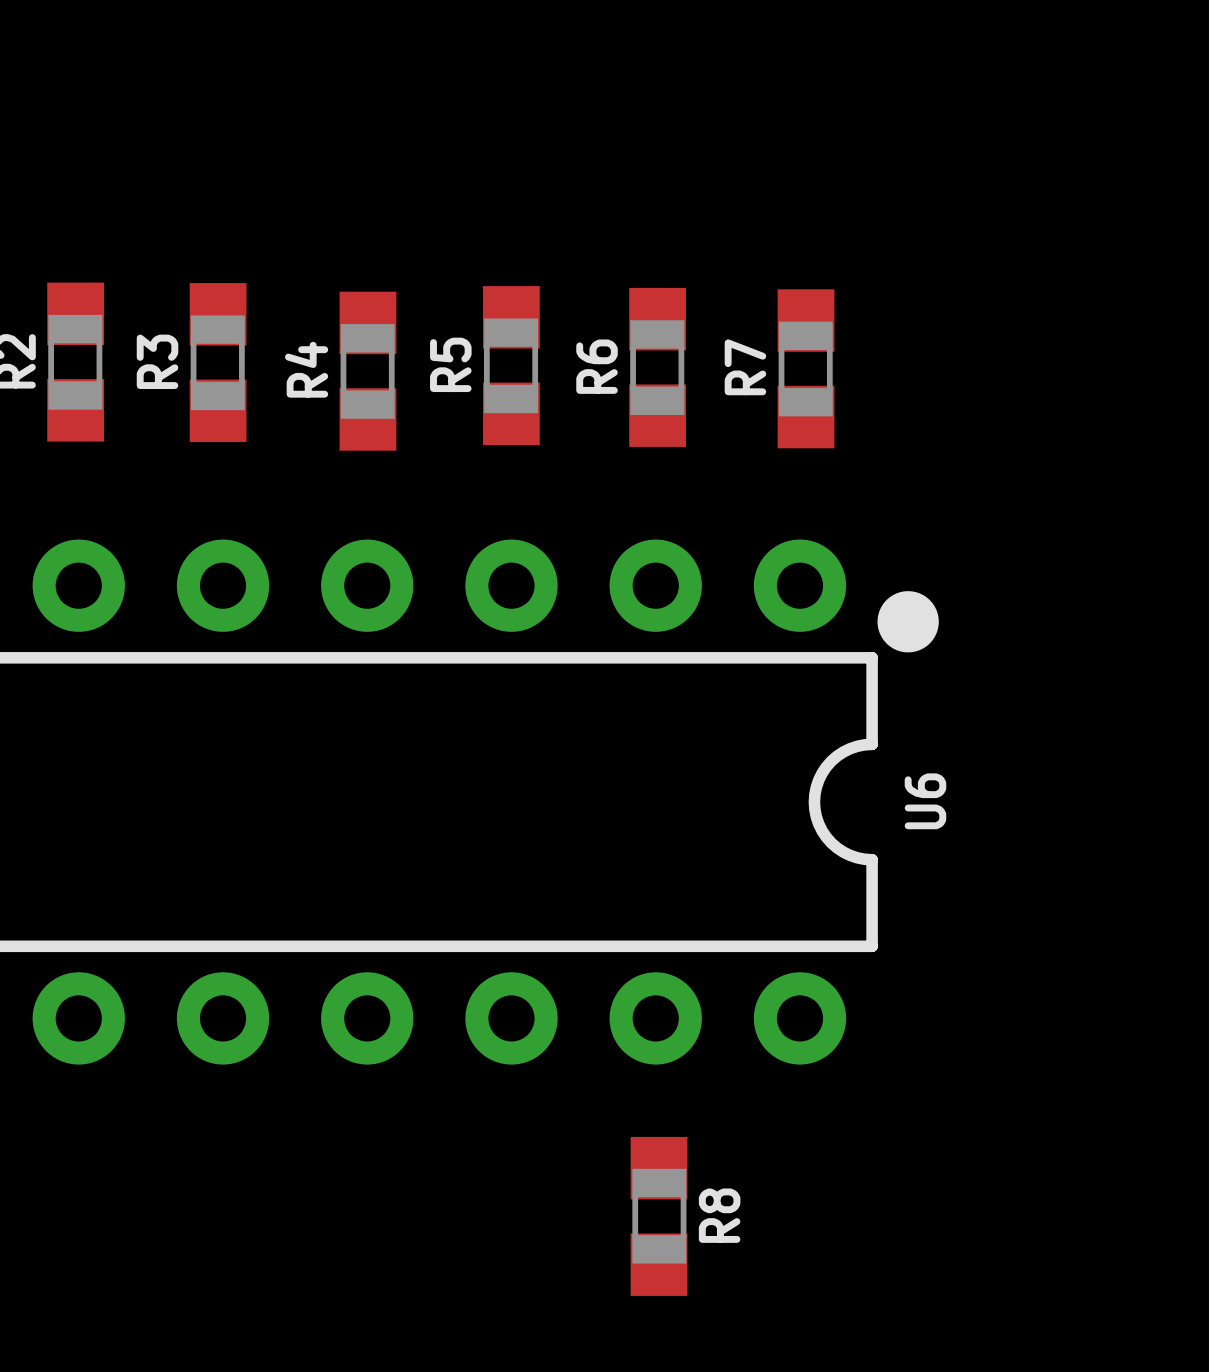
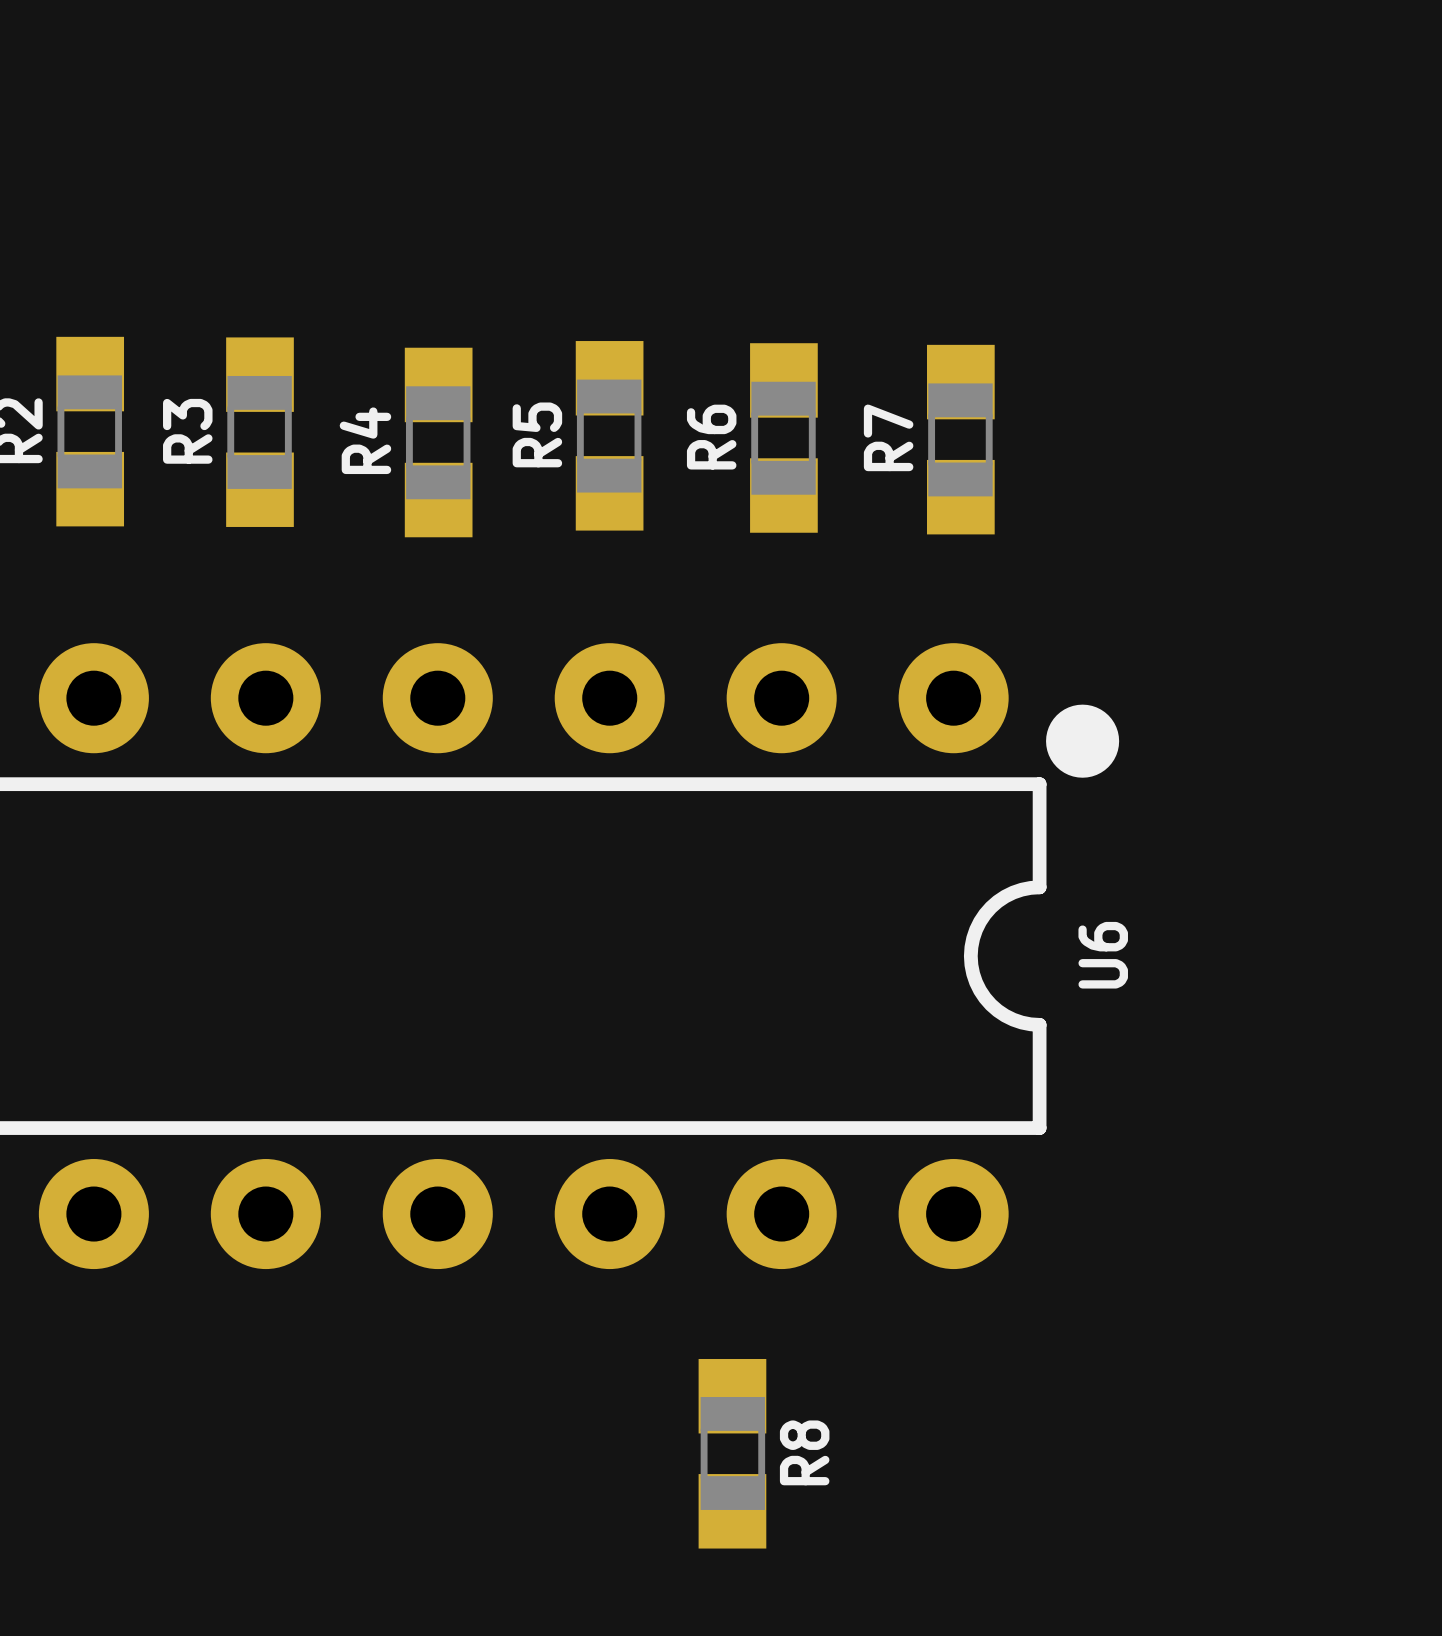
R8 position: (659, 1216) -> (732, 1453)

